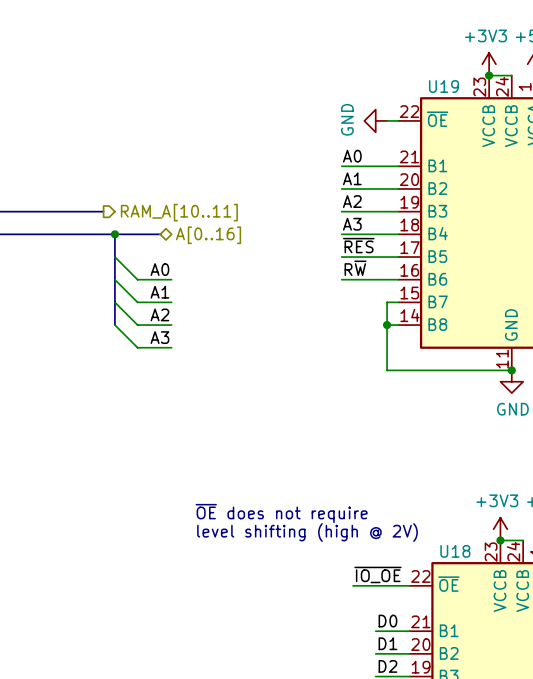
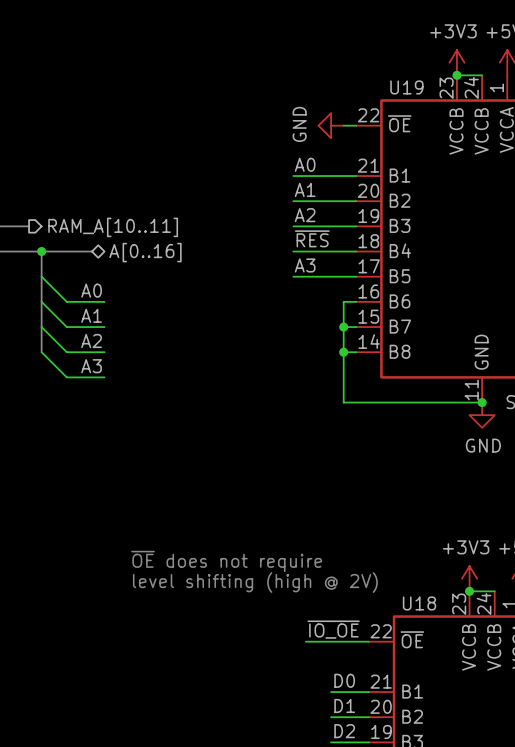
label: A3 (352, 224) -> ~{RES} (312, 238)
label: ~{RES} (358, 245) -> A3 (305, 265)
label: R~{W} (355, 268) -> none
wire: (341, 279) (387, 279) -> (343, 327) (343, 301)
junction: none -> (343, 327)

